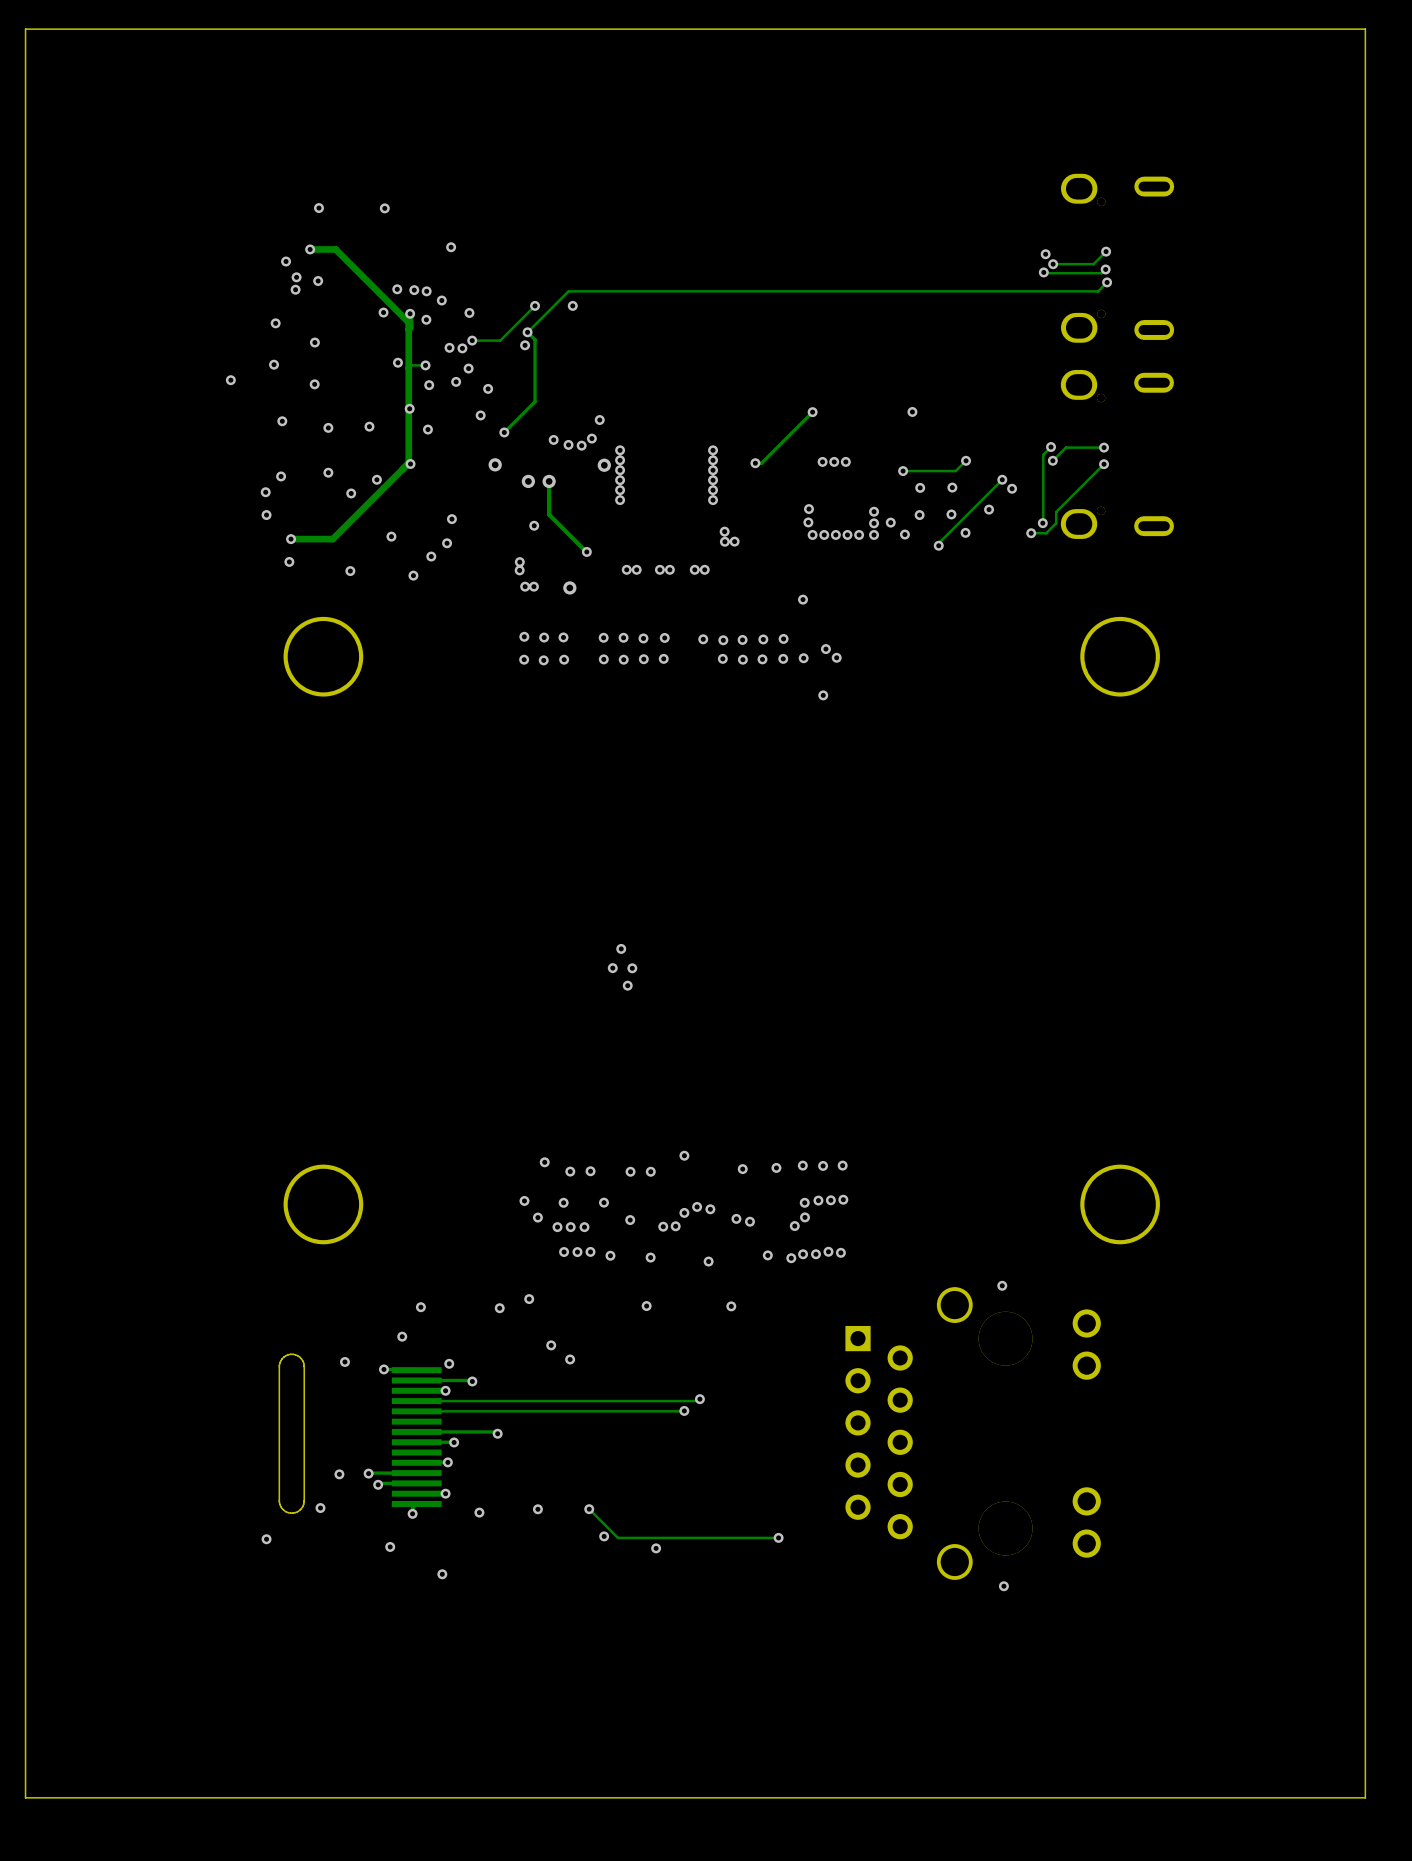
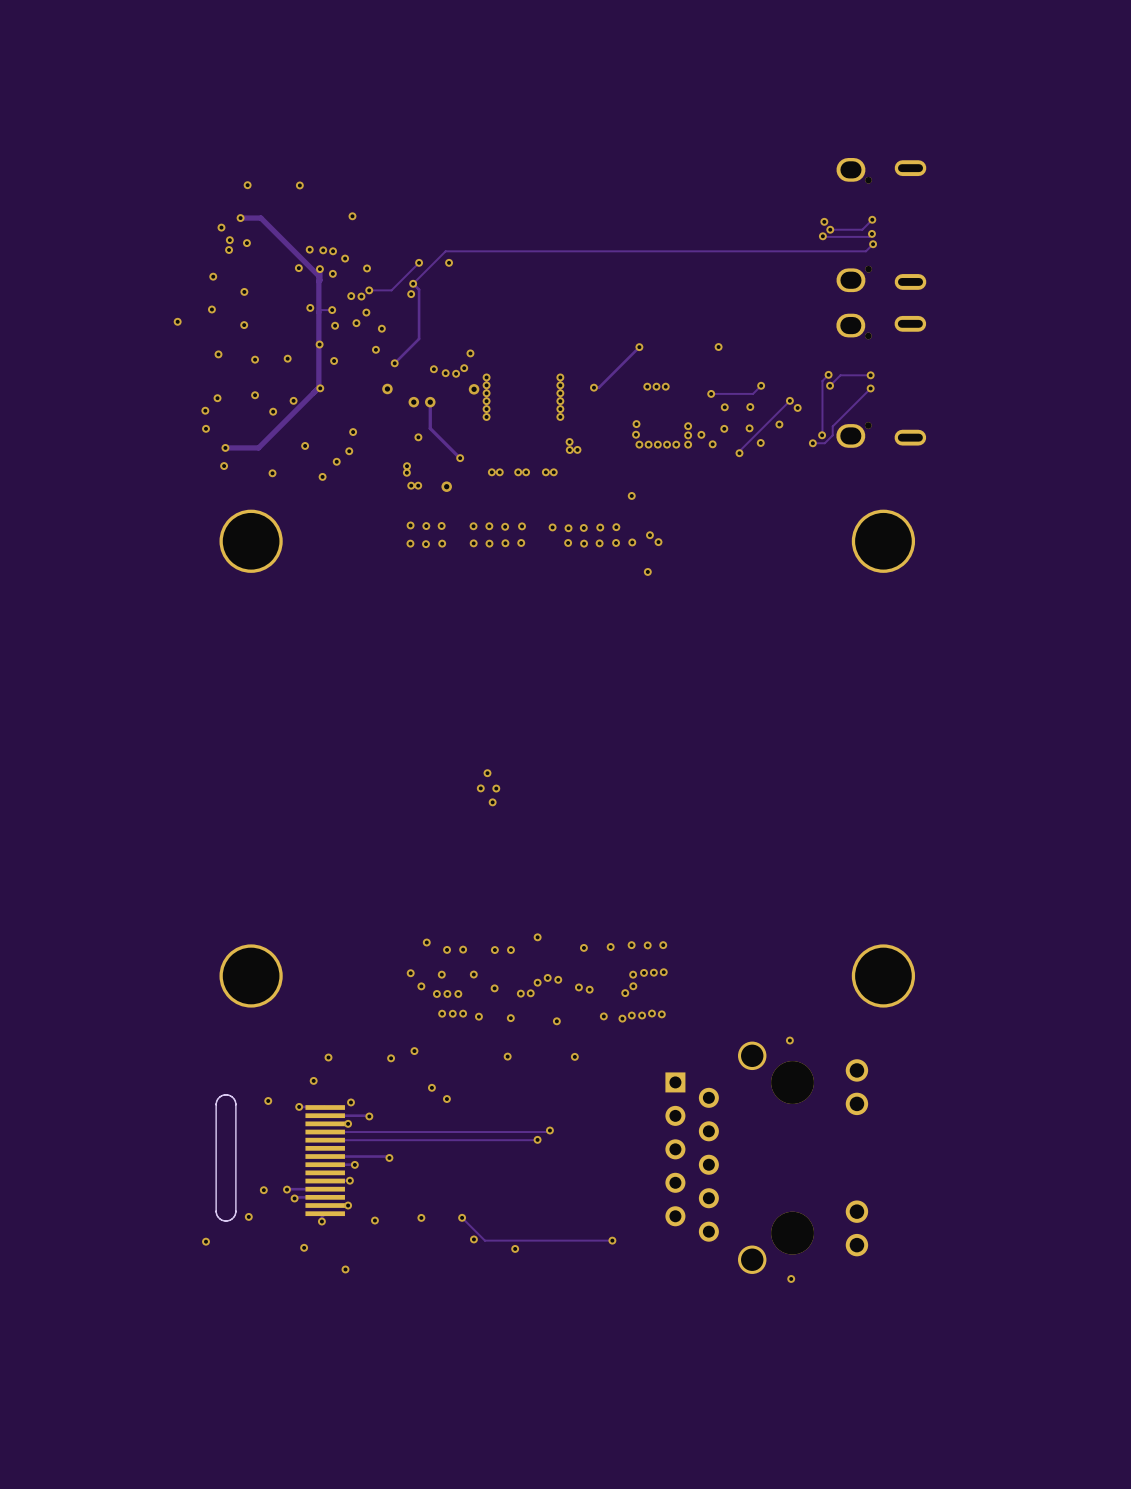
board edge: (1365, 29) (25, 29) (25, 1797) (1365, 1797) (1365, 29) -> none

